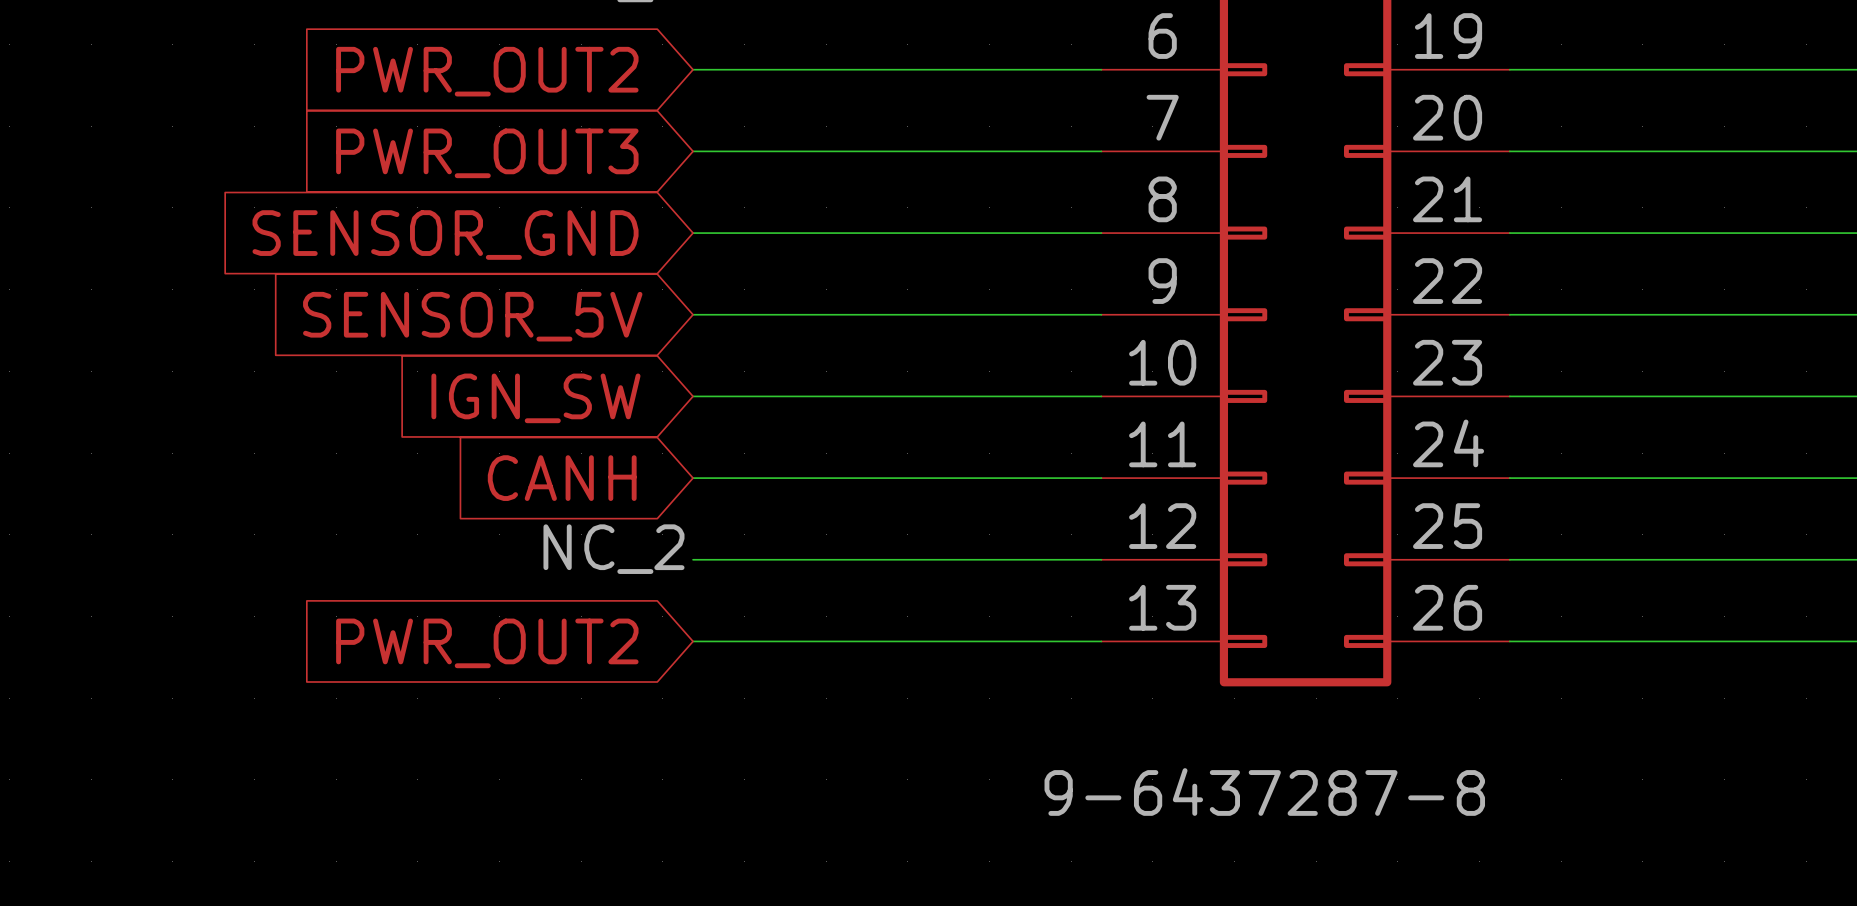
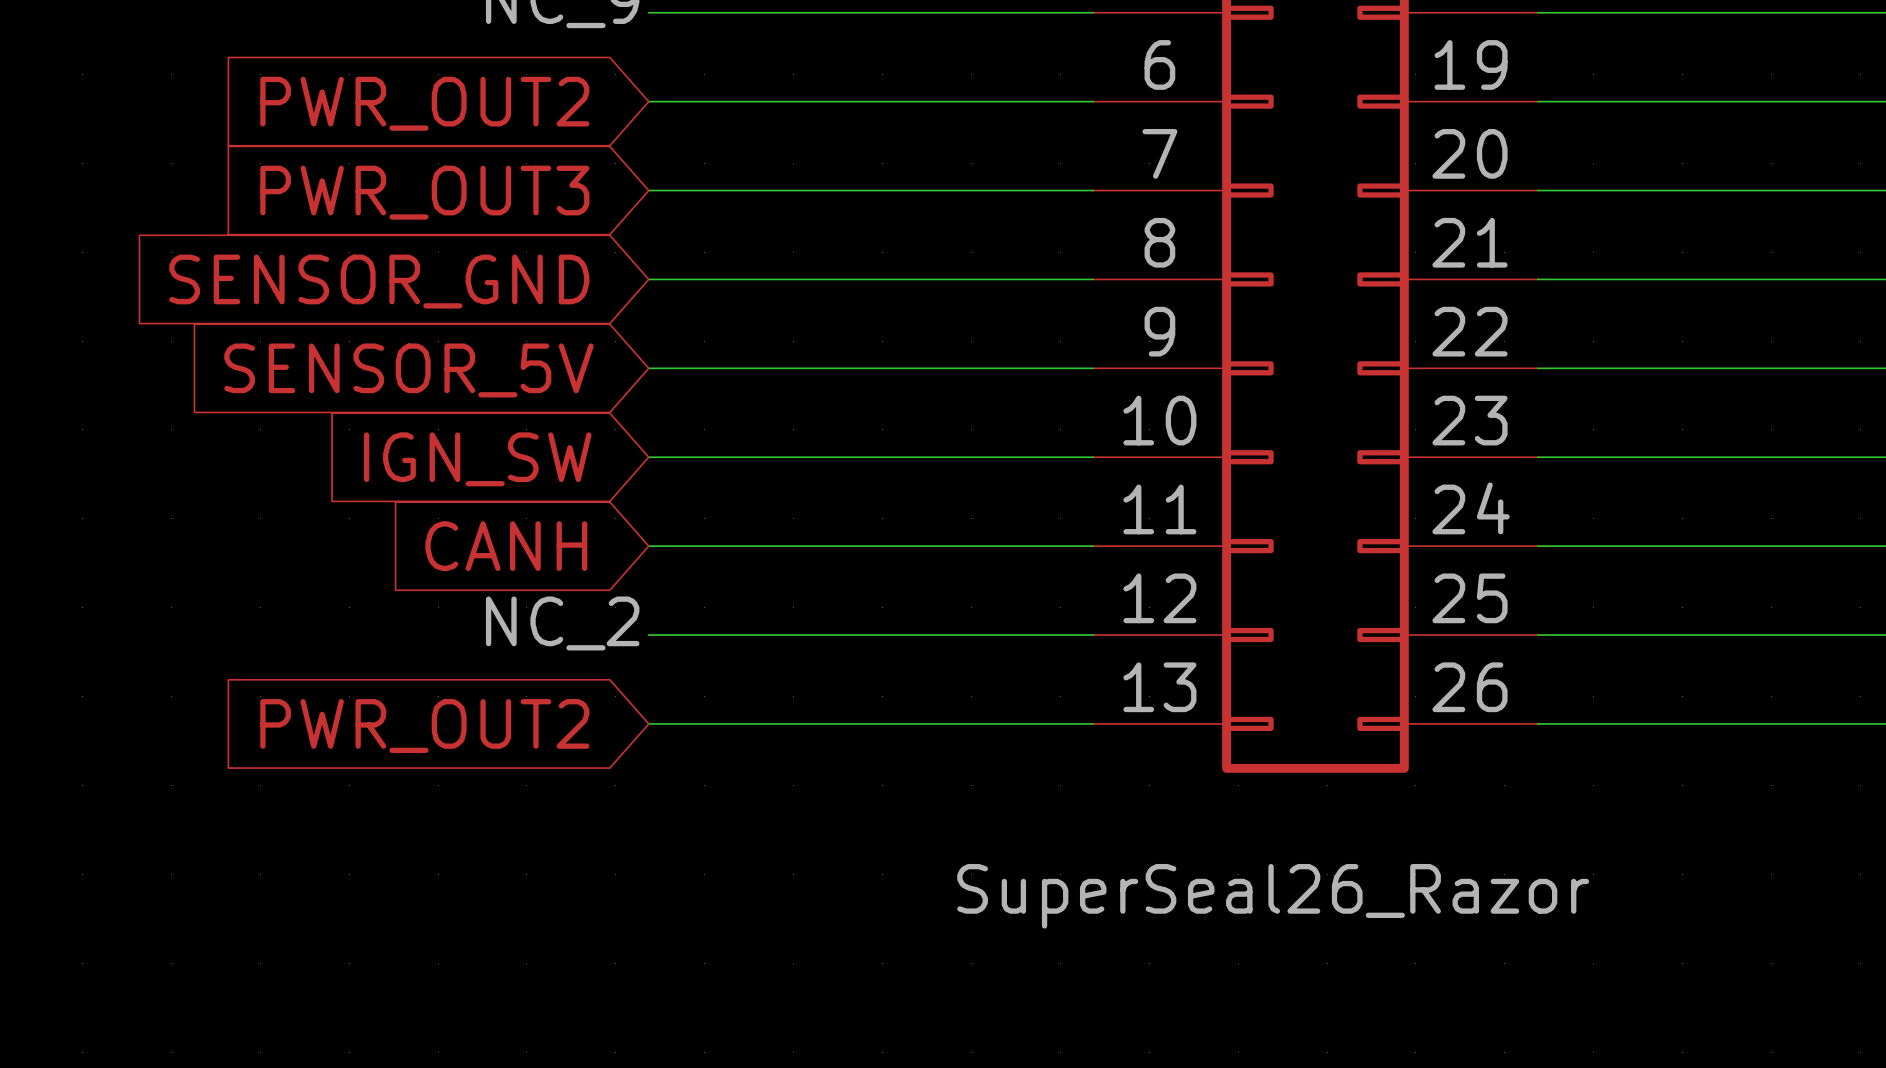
part value: 9-6437287-8 (1264, 792) -> SuperSeal26_Razor (1273, 896)

